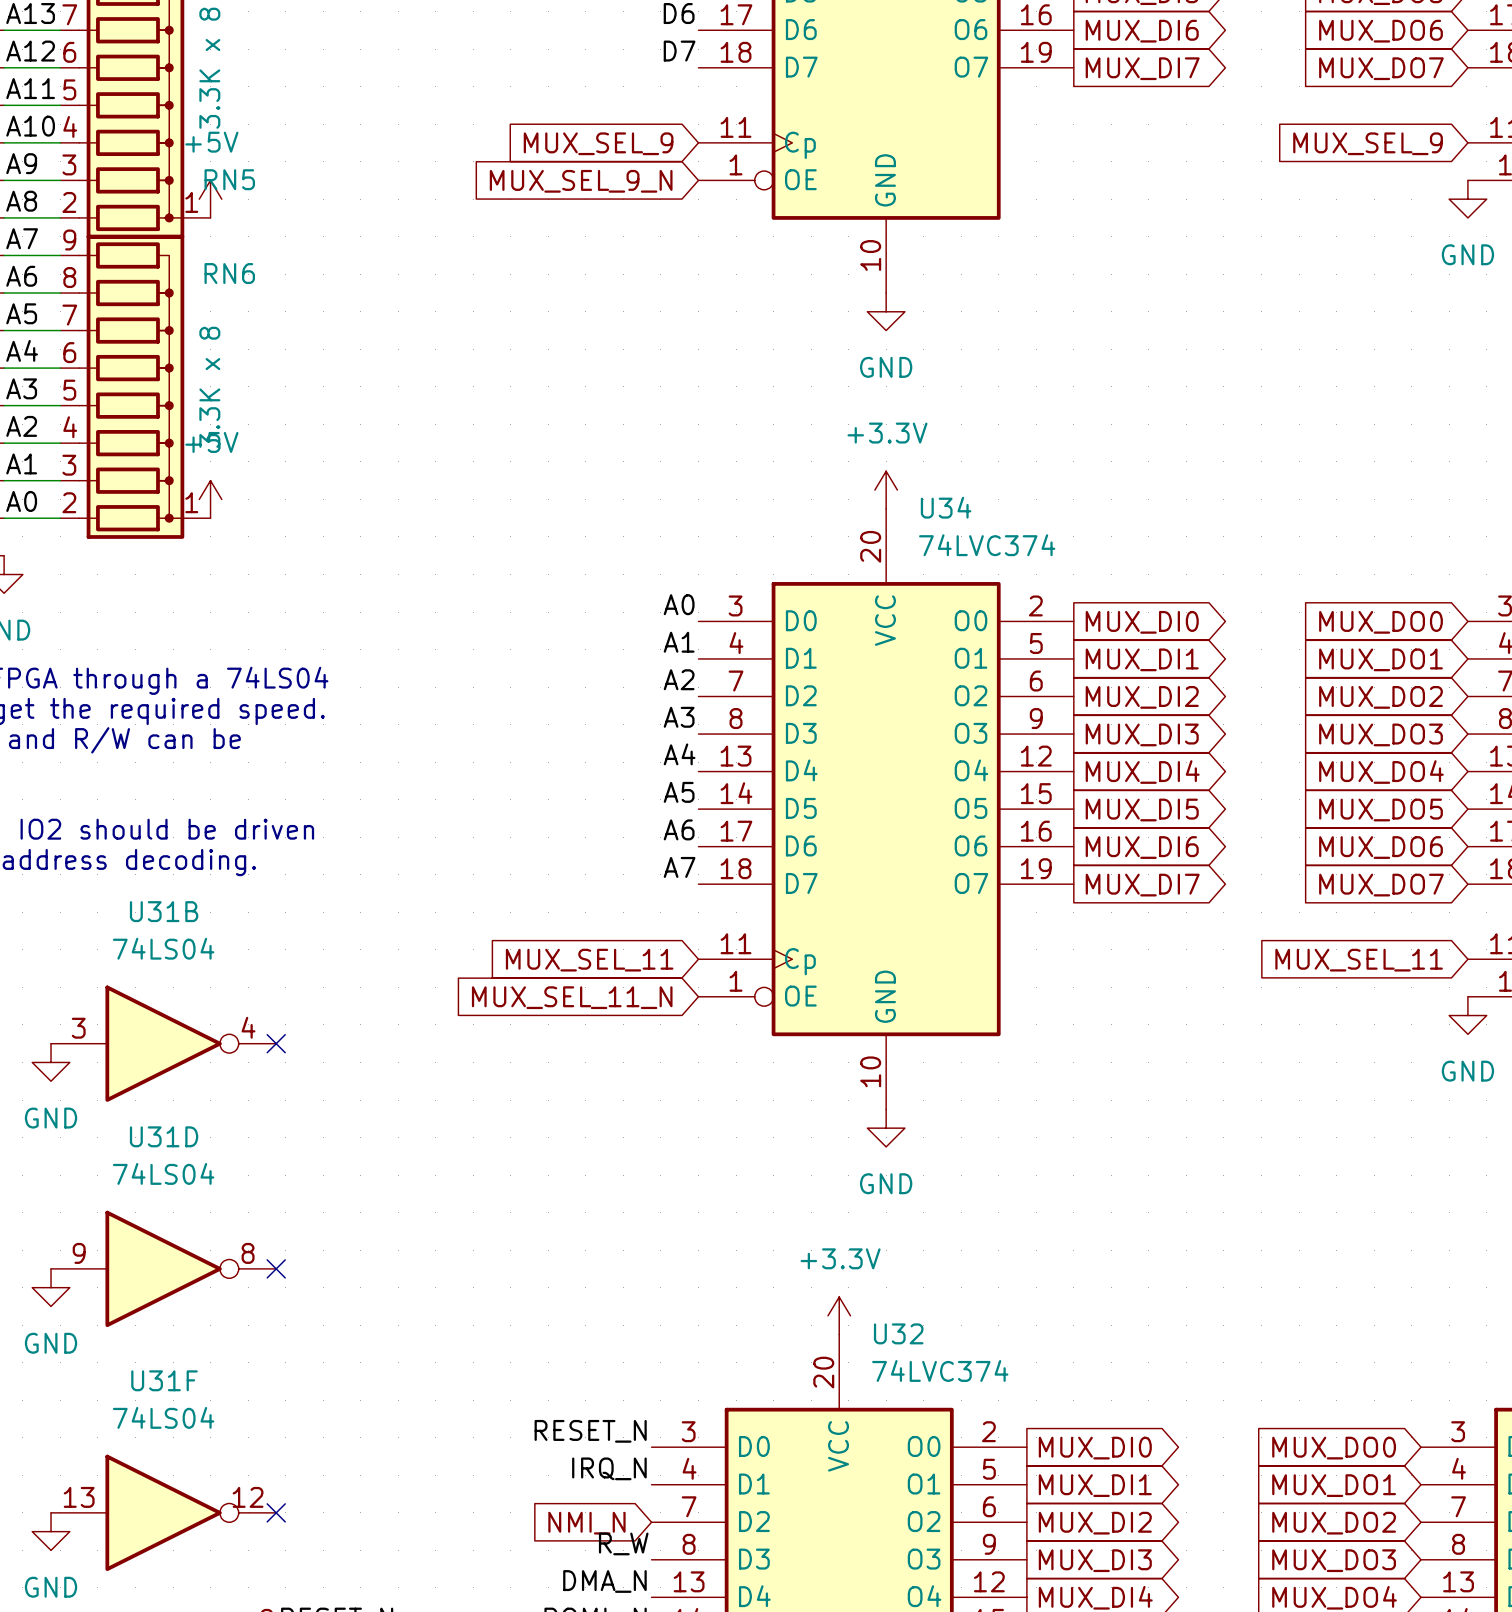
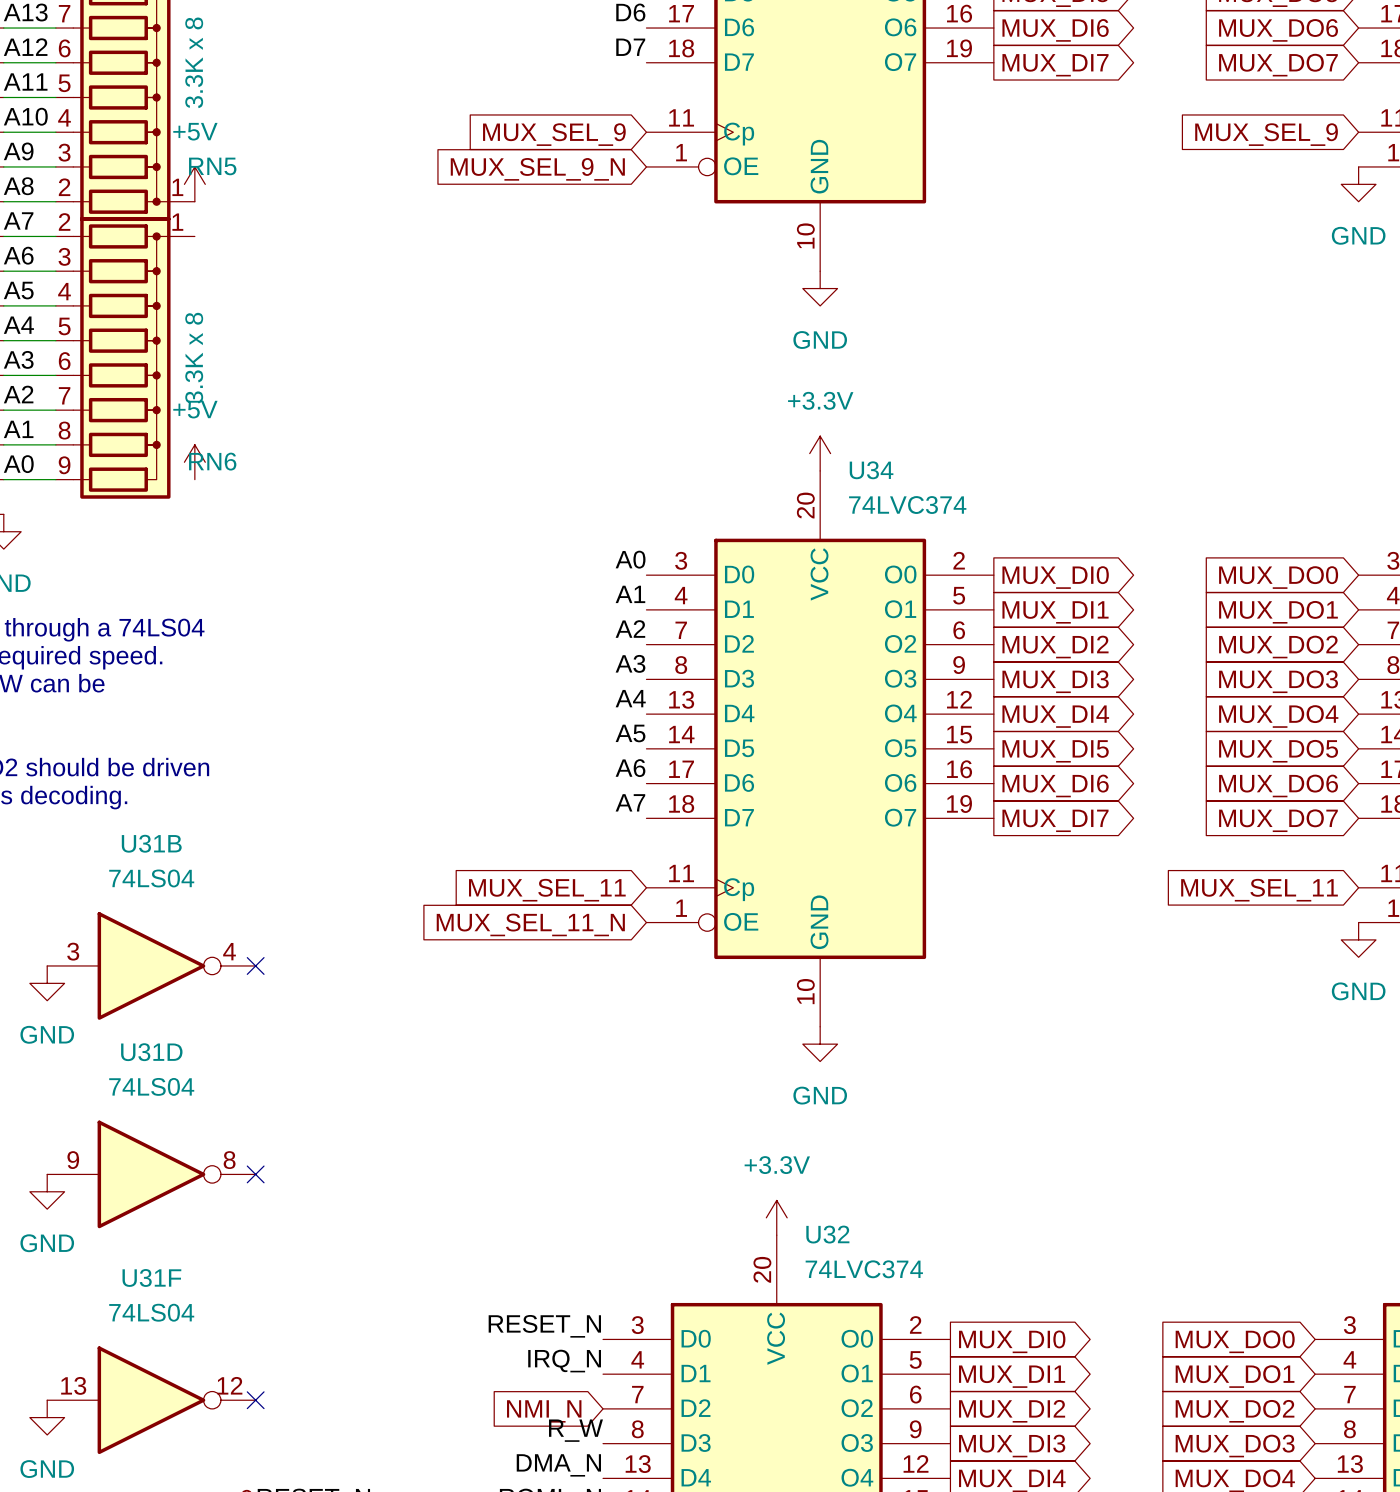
RN6 flip: as is (131, 386) -> up-down (121, 358)

